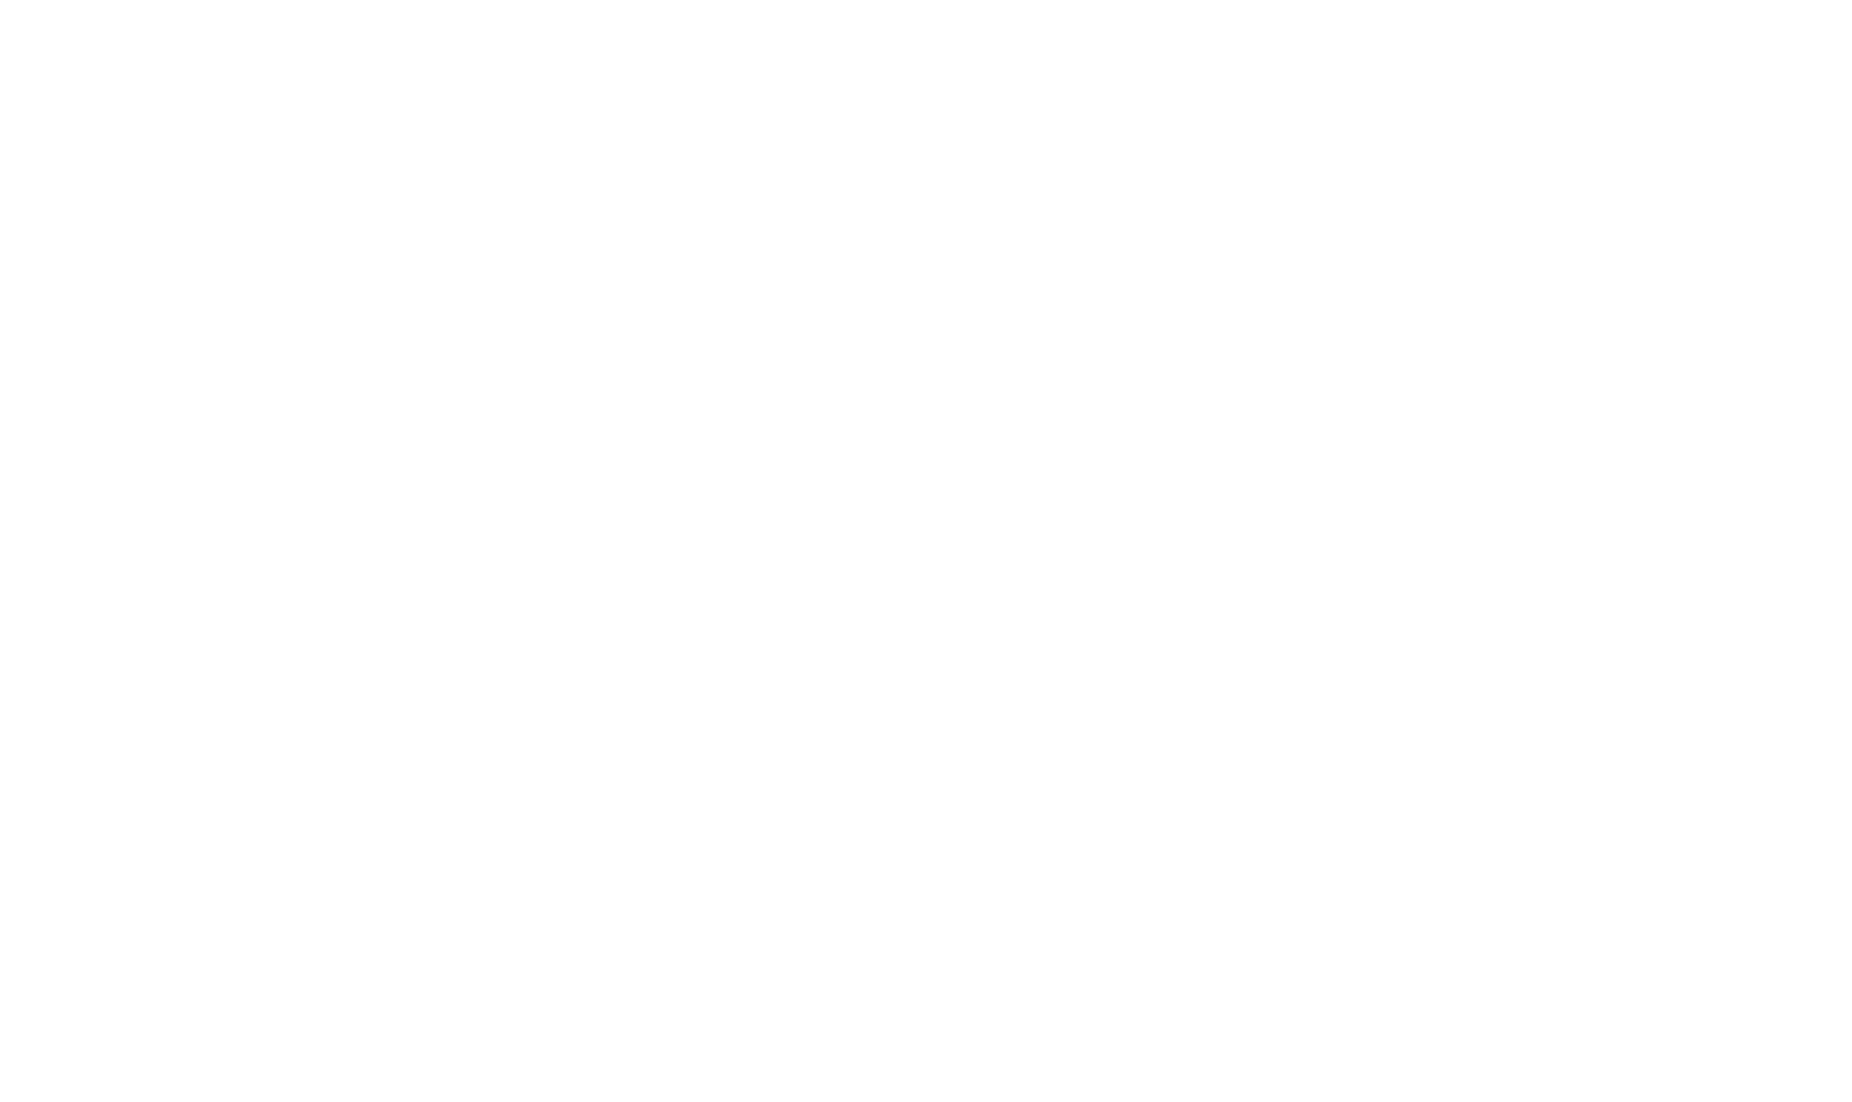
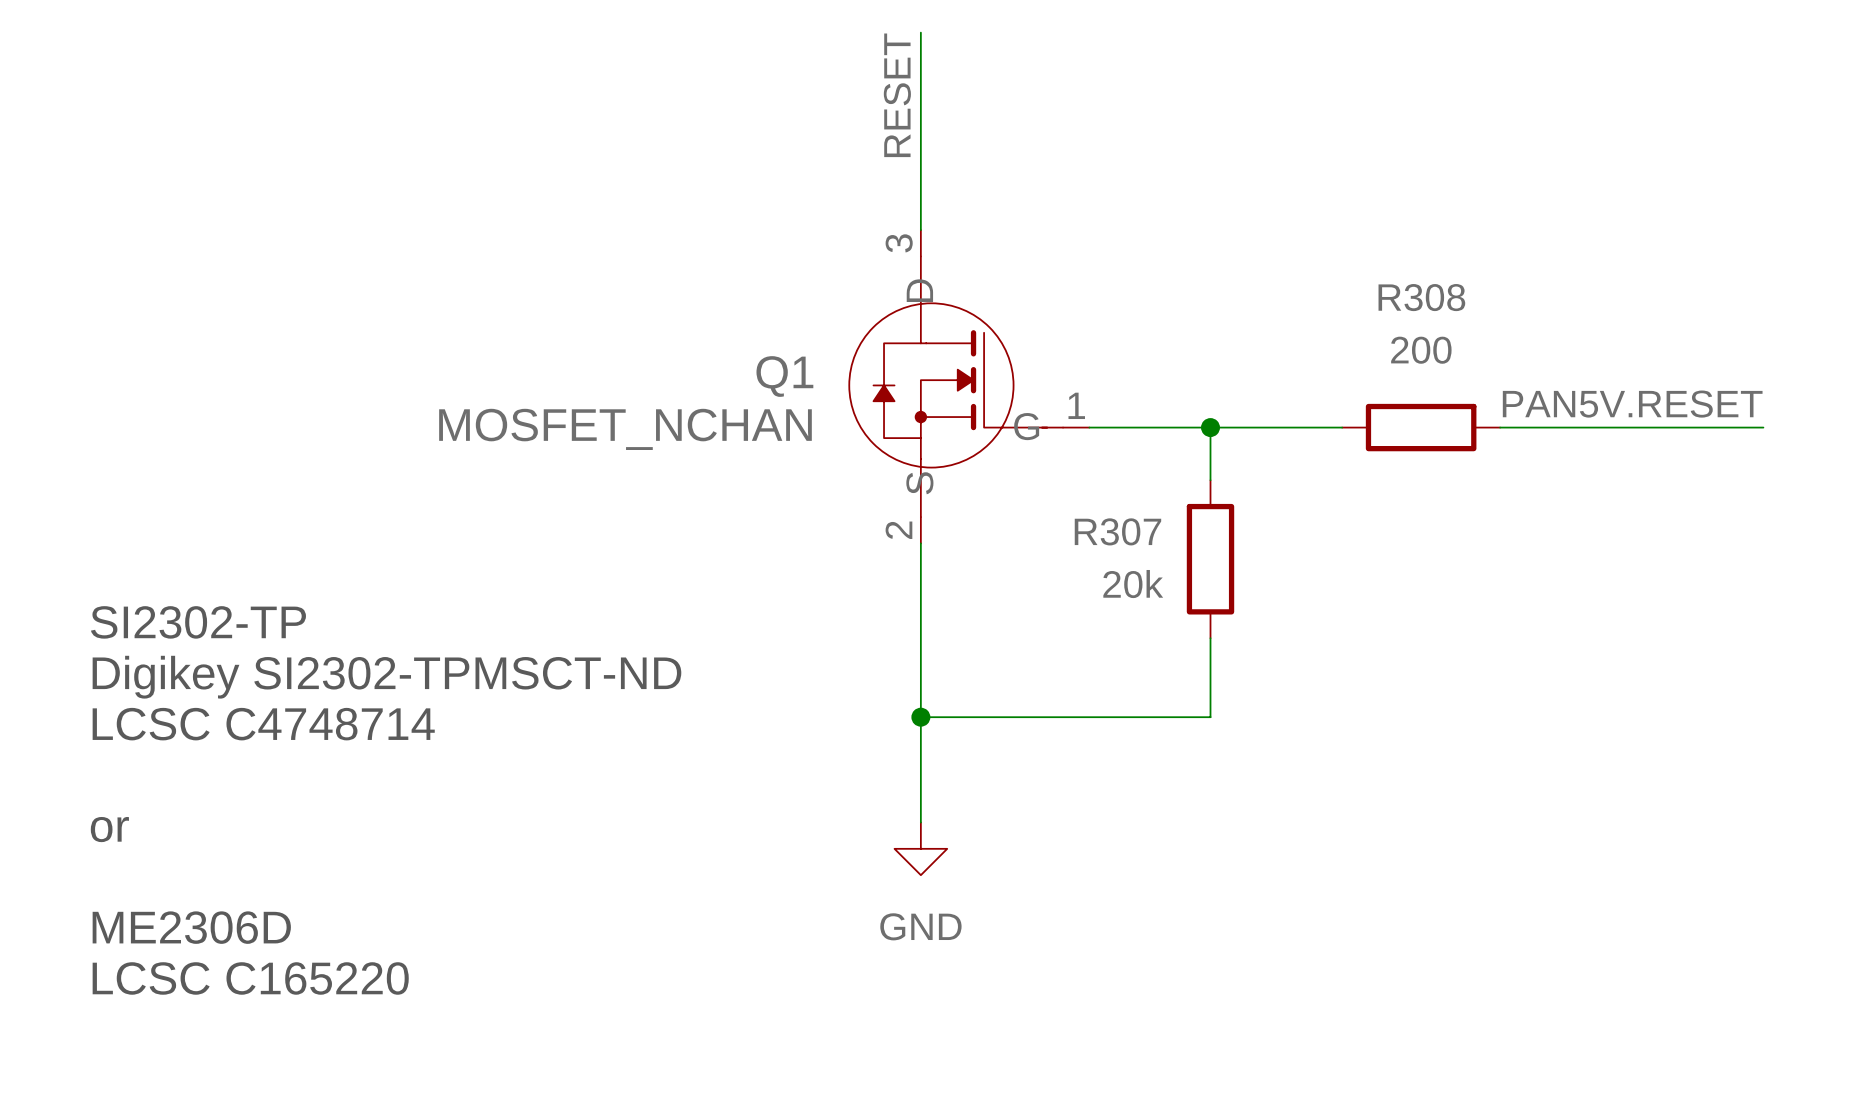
wire: none -> (920, 32) (920, 230)
label: none -> RESET (897, 95)
Q1: none -> MOSFET_NCHAN (969, 386)
label: none -> PAN5V.RESET (1632, 404)
wire: none -> (1089, 427) (1342, 427)
wire: none -> (1210, 427) (1210, 480)
junction: none -> (1210, 427)
R308: none -> 200 (1421, 427)
wire: none -> (1500, 427) (1763, 427)
wire: none -> (920, 543) (920, 822)
R307: none -> 20k (1210, 559)
text: none -> SI2302-TP (198, 622)
wire: none -> (1210, 638) (1210, 717) (920, 717)
text: none -> Digikey SI2302-TPMSCT-ND (386, 677)
junction: none -> (920, 717)
text: none -> LCSC C4748714 (263, 724)
text: none -> or (109, 829)
power symbol: none -> GND (920, 848)
text: none -> ME2306D (191, 927)
text: none -> LCSC C165220 (250, 978)

